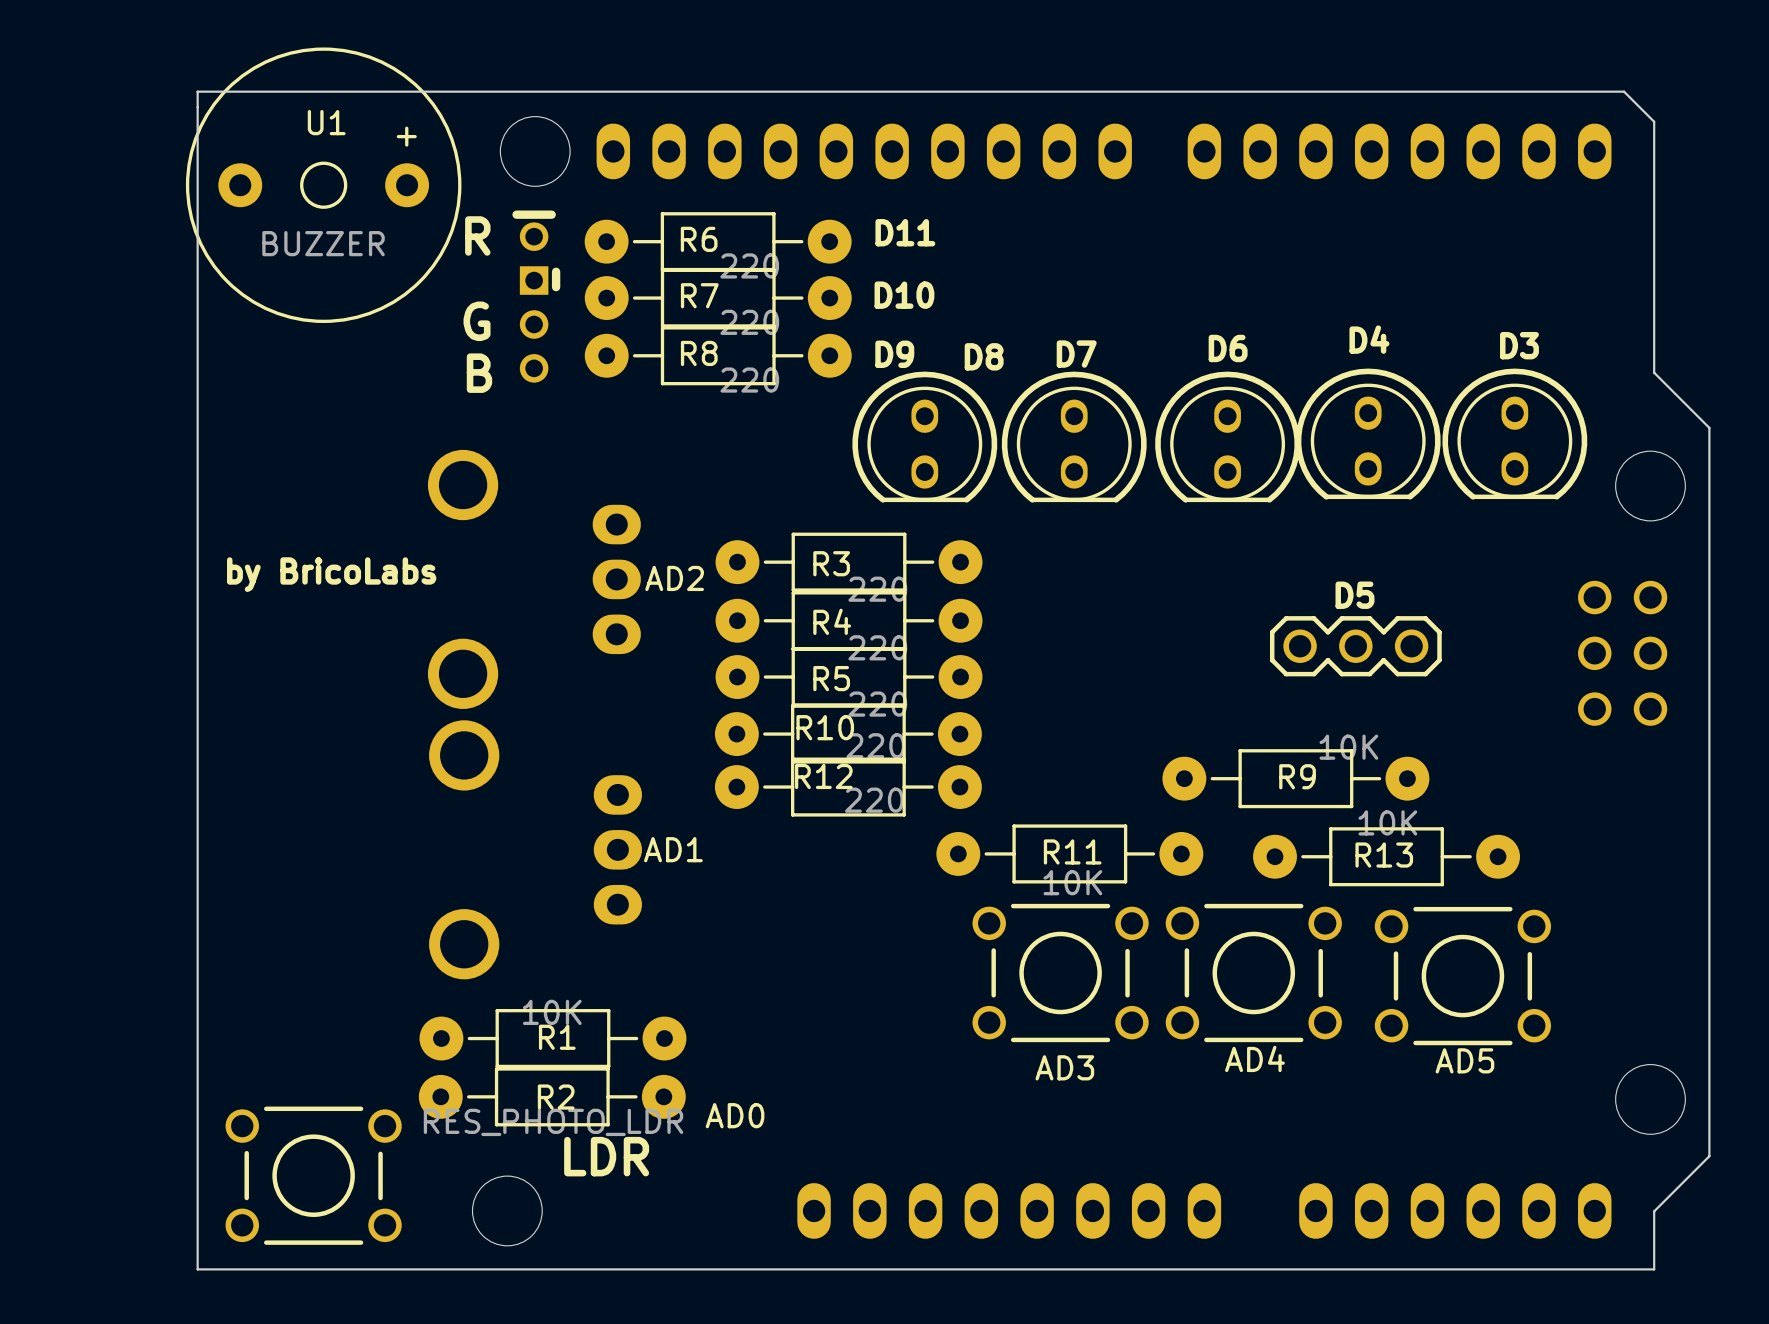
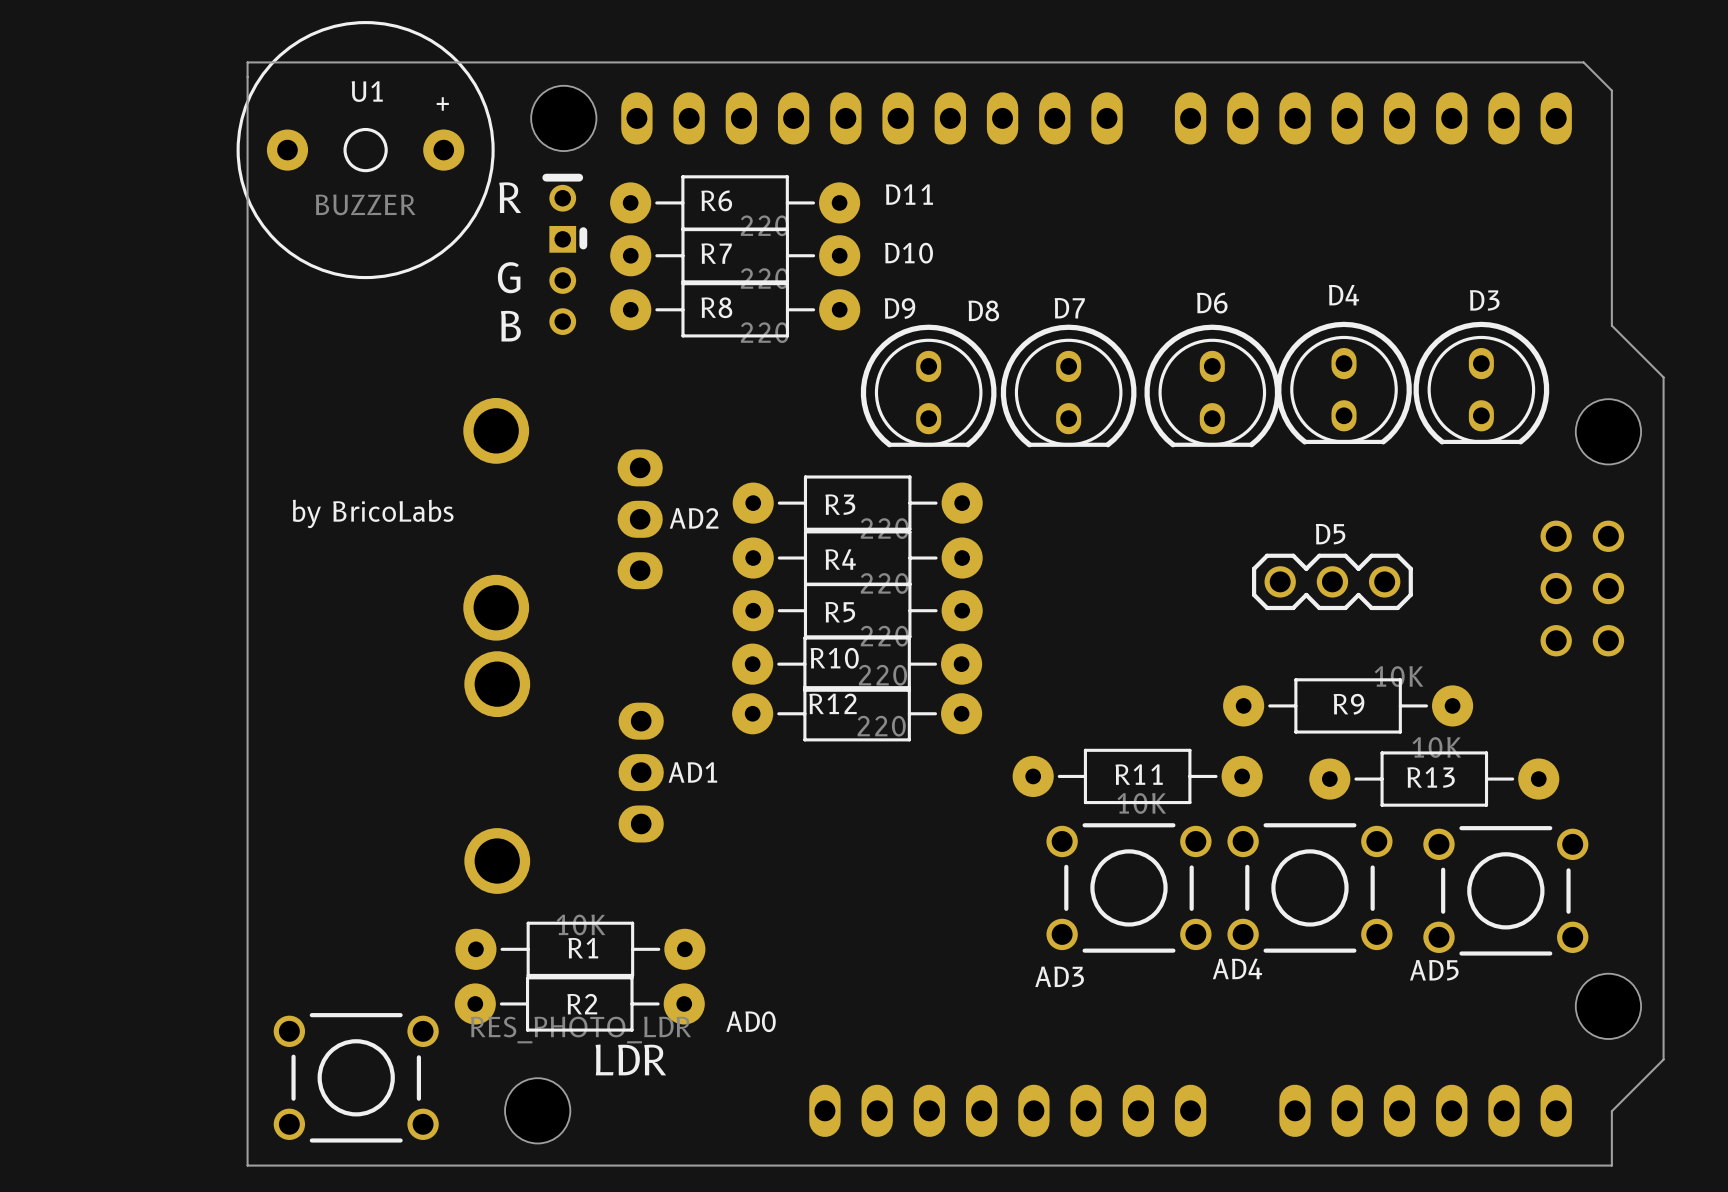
R9 position: (1295, 778) -> (1348, 705)
R11 position: (1069, 853) -> (1137, 776)
R13 position: (1386, 856) -> (1434, 779)
part: (1060, 973) -> none
part: none -> (1128, 887)
part: (1253, 973) -> none
part: none -> (1309, 887)
part: (1462, 976) -> none
part: none -> (1505, 890)

